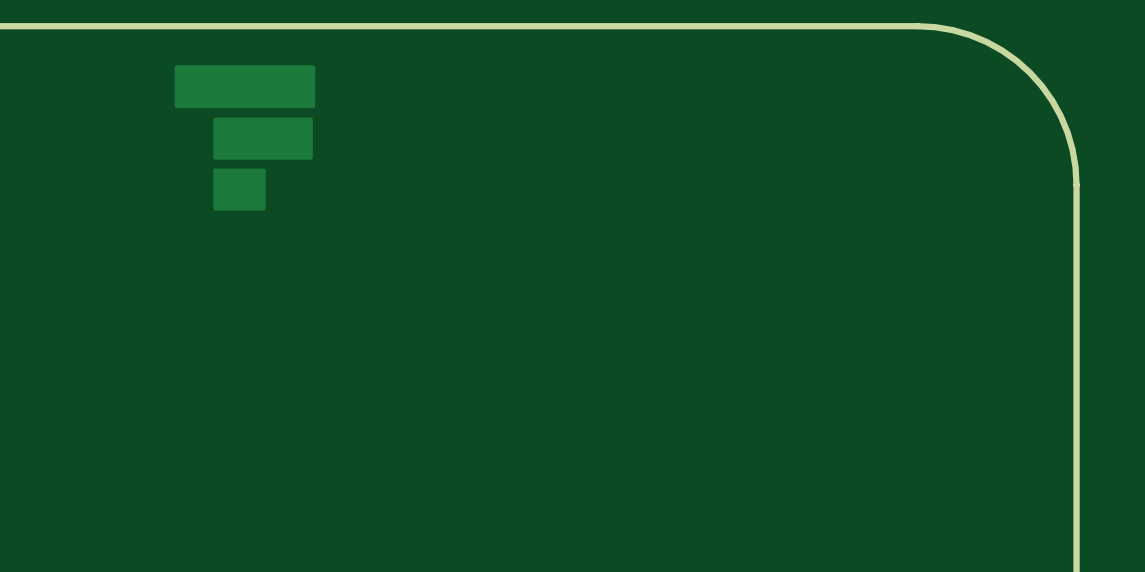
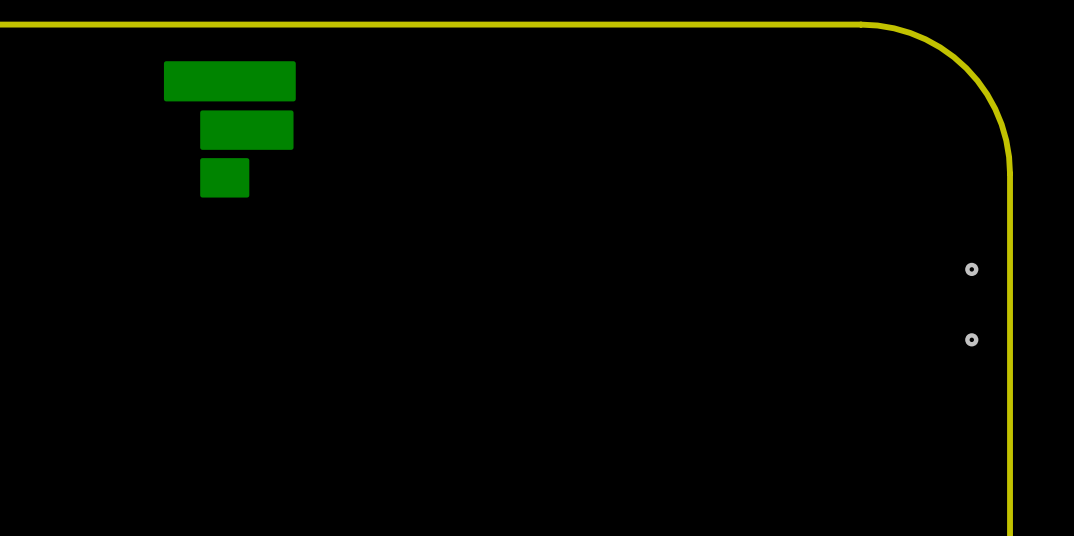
via: none -> (971, 269)
via: none -> (971, 339)

